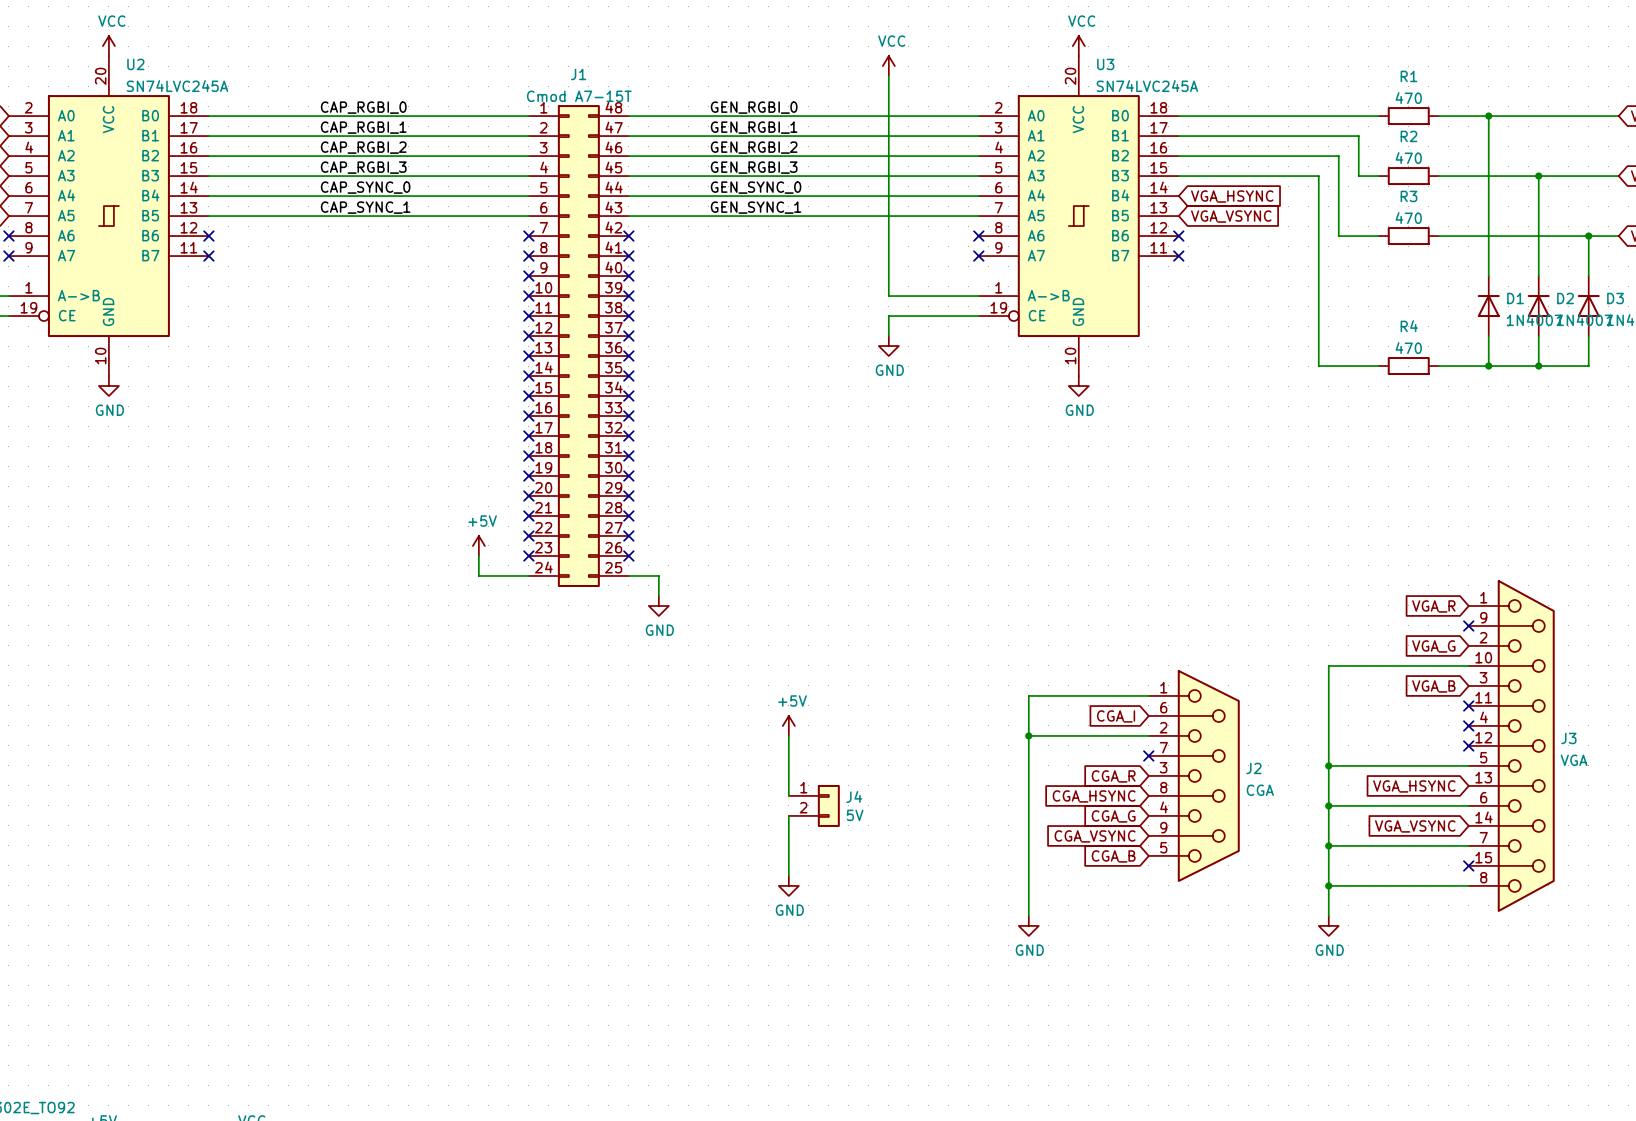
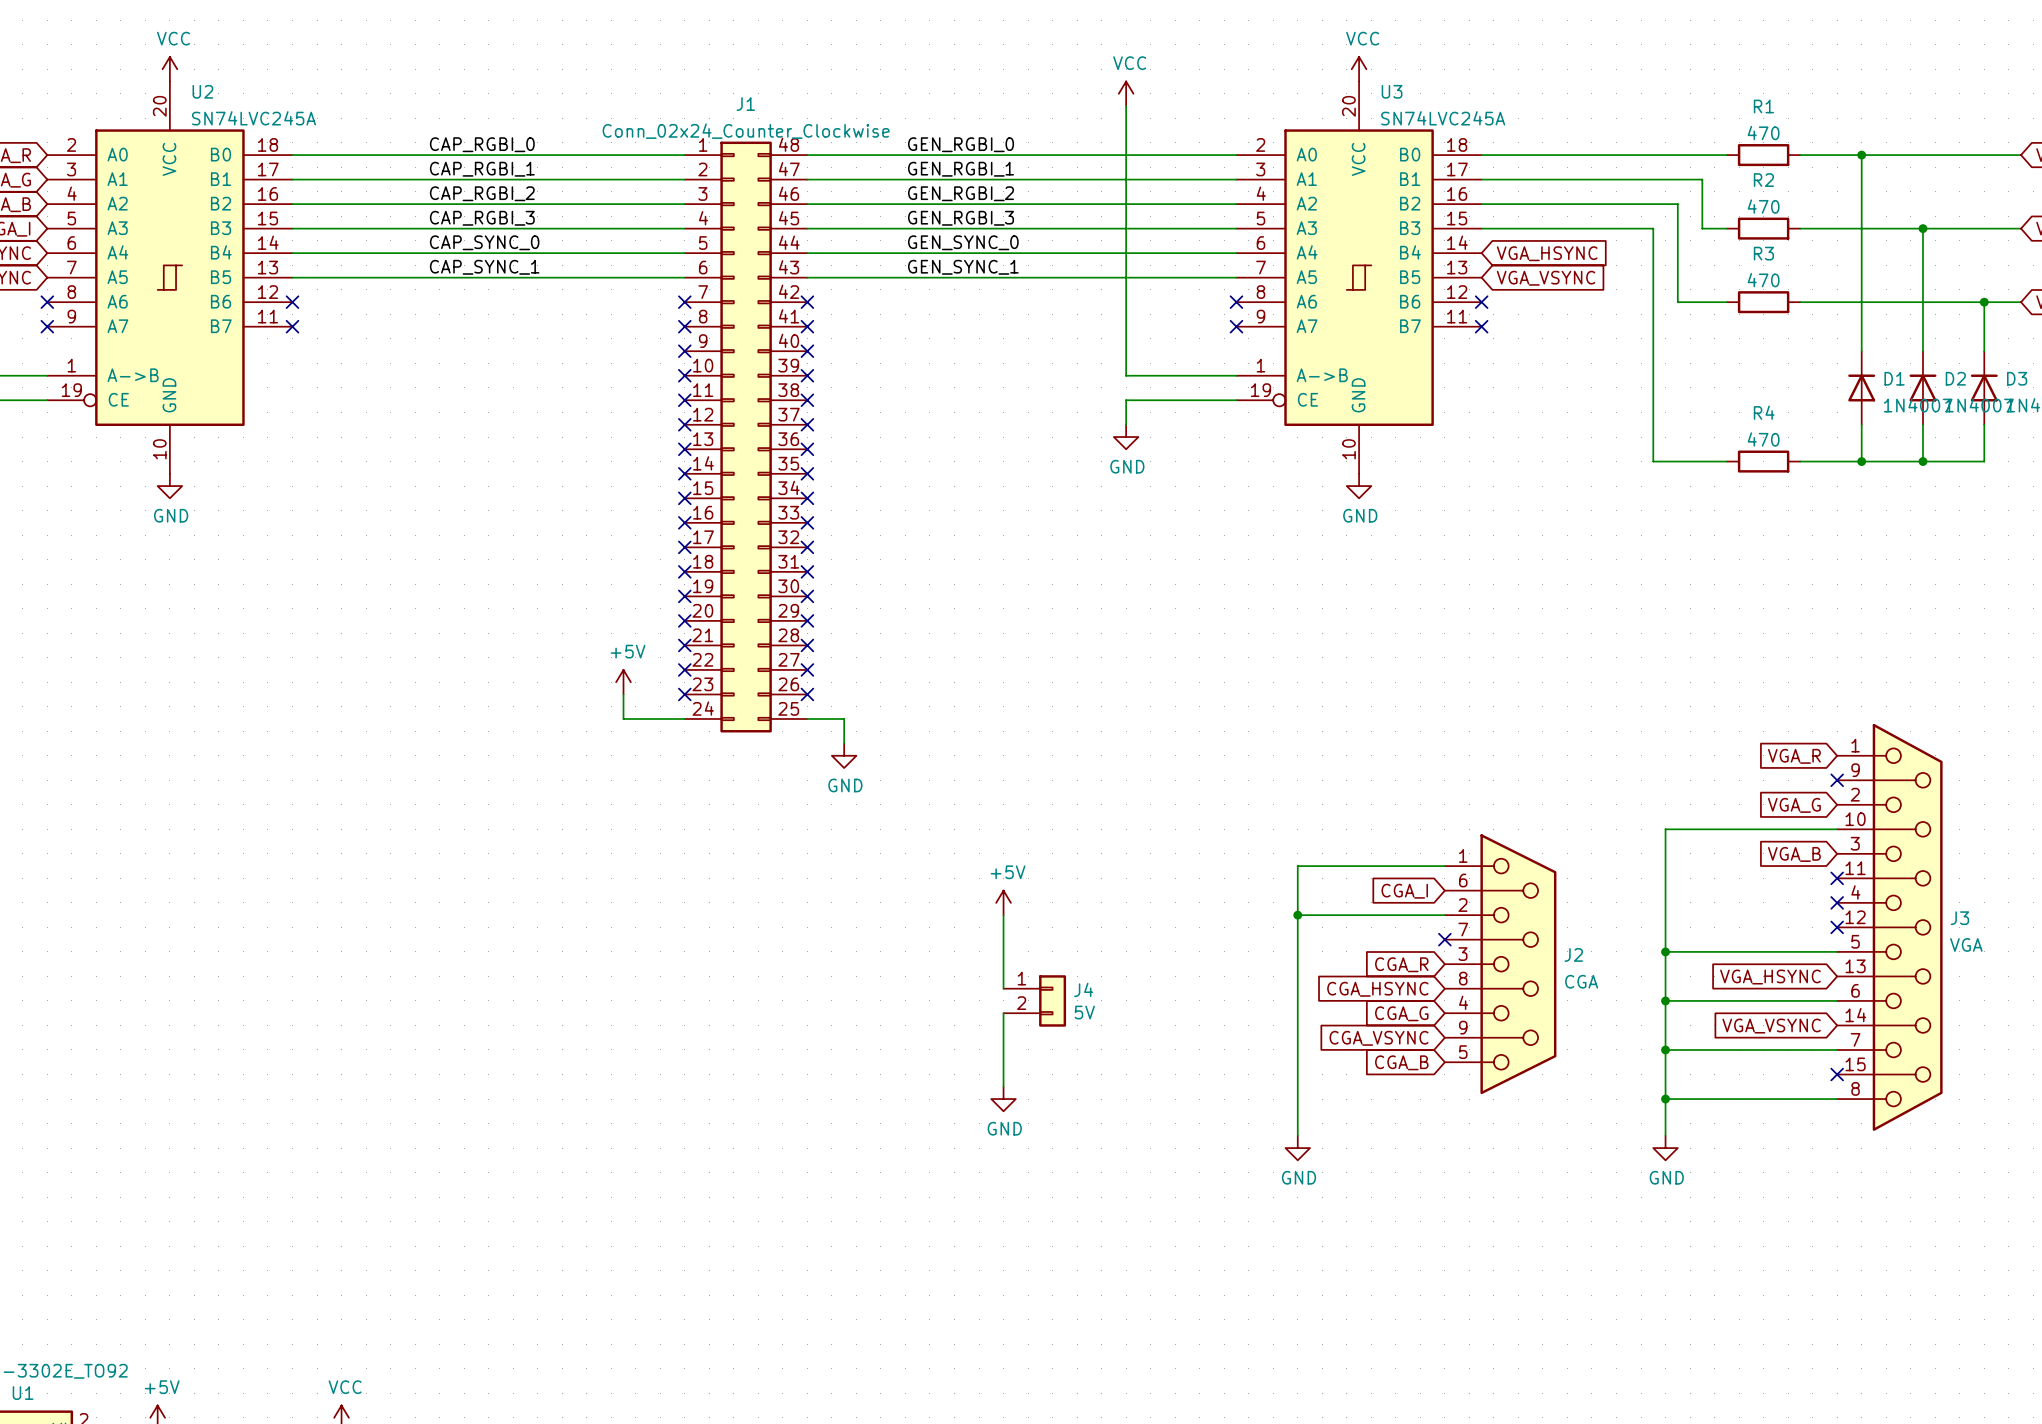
J1 value: Cmod A7-15T (579, 96) -> Conn_02x24_Counter_Clockwise (746, 131)

